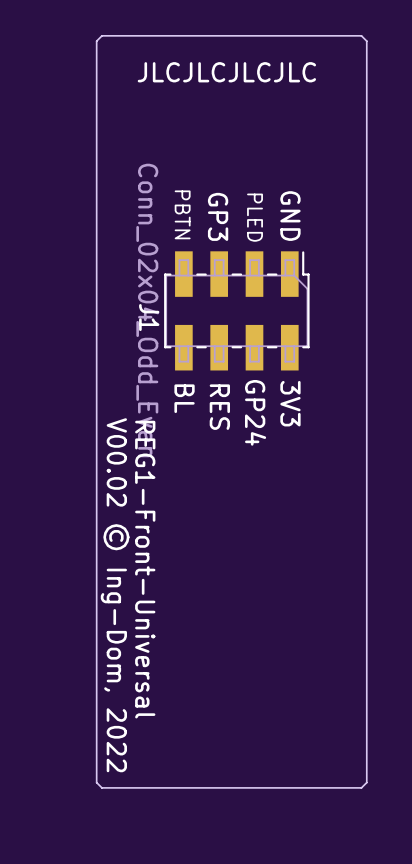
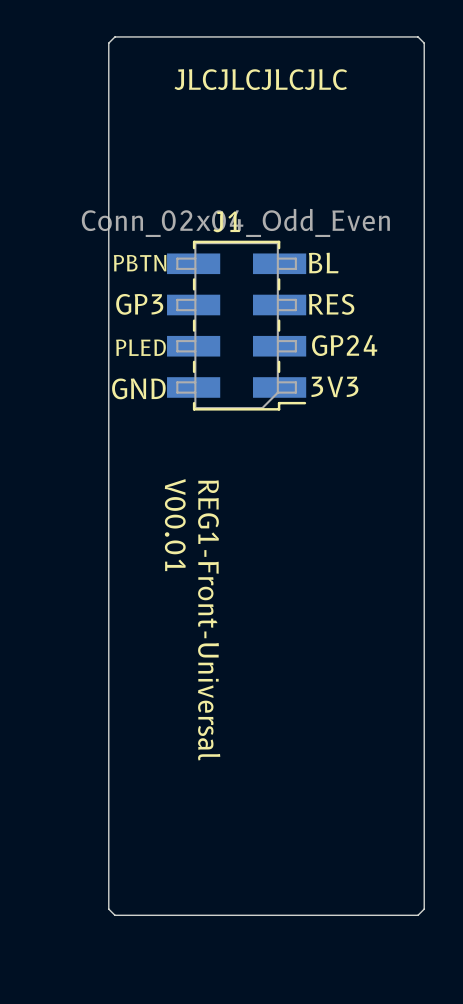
text rotation: 0° (182, 214) -> 90° counterclockwise (140, 263)
text position: PBTN (182, 214) -> PBTN (140, 263)
text rotation: 0° (218, 216) -> 90° counterclockwise (139, 304)
text position: GP3 (218, 216) -> GP3 (139, 304)
text rotation: 0° (290, 216) -> 90° counterclockwise (138, 388)
text position: GND (290, 216) -> GND (138, 388)
text rotation: 0° (255, 217) -> 90° counterclockwise (140, 347)
text position: PLED (255, 217) -> PLED (140, 347)
J1 rotation: 0° (236, 310) -> 90° clockwise (236, 325)
text rotation: 0° (184, 398) -> 90° counterclockwise (323, 262)
text position: BL (184, 398) -> BL (323, 262)
text rotation: 0° (290, 403) -> 90° counterclockwise (334, 386)
text position: 3V3 (290, 403) -> 3V3 (334, 386)
text rotation: 0° (219, 407) -> 90° counterclockwise (331, 304)
text position: RES (219, 407) -> RES (331, 304)
text rotation: 0° (255, 412) -> 90° counterclockwise (344, 345)
text position: GP24 (255, 412) -> GP24 (344, 345)
text: none -> V00.01 (175, 525)
text position: REG1-Front-Universal (145, 569) -> REG1-Front-Universal (209, 620)
text: V00.02 © Ing-Dom, 2022 (115, 595) -> none

